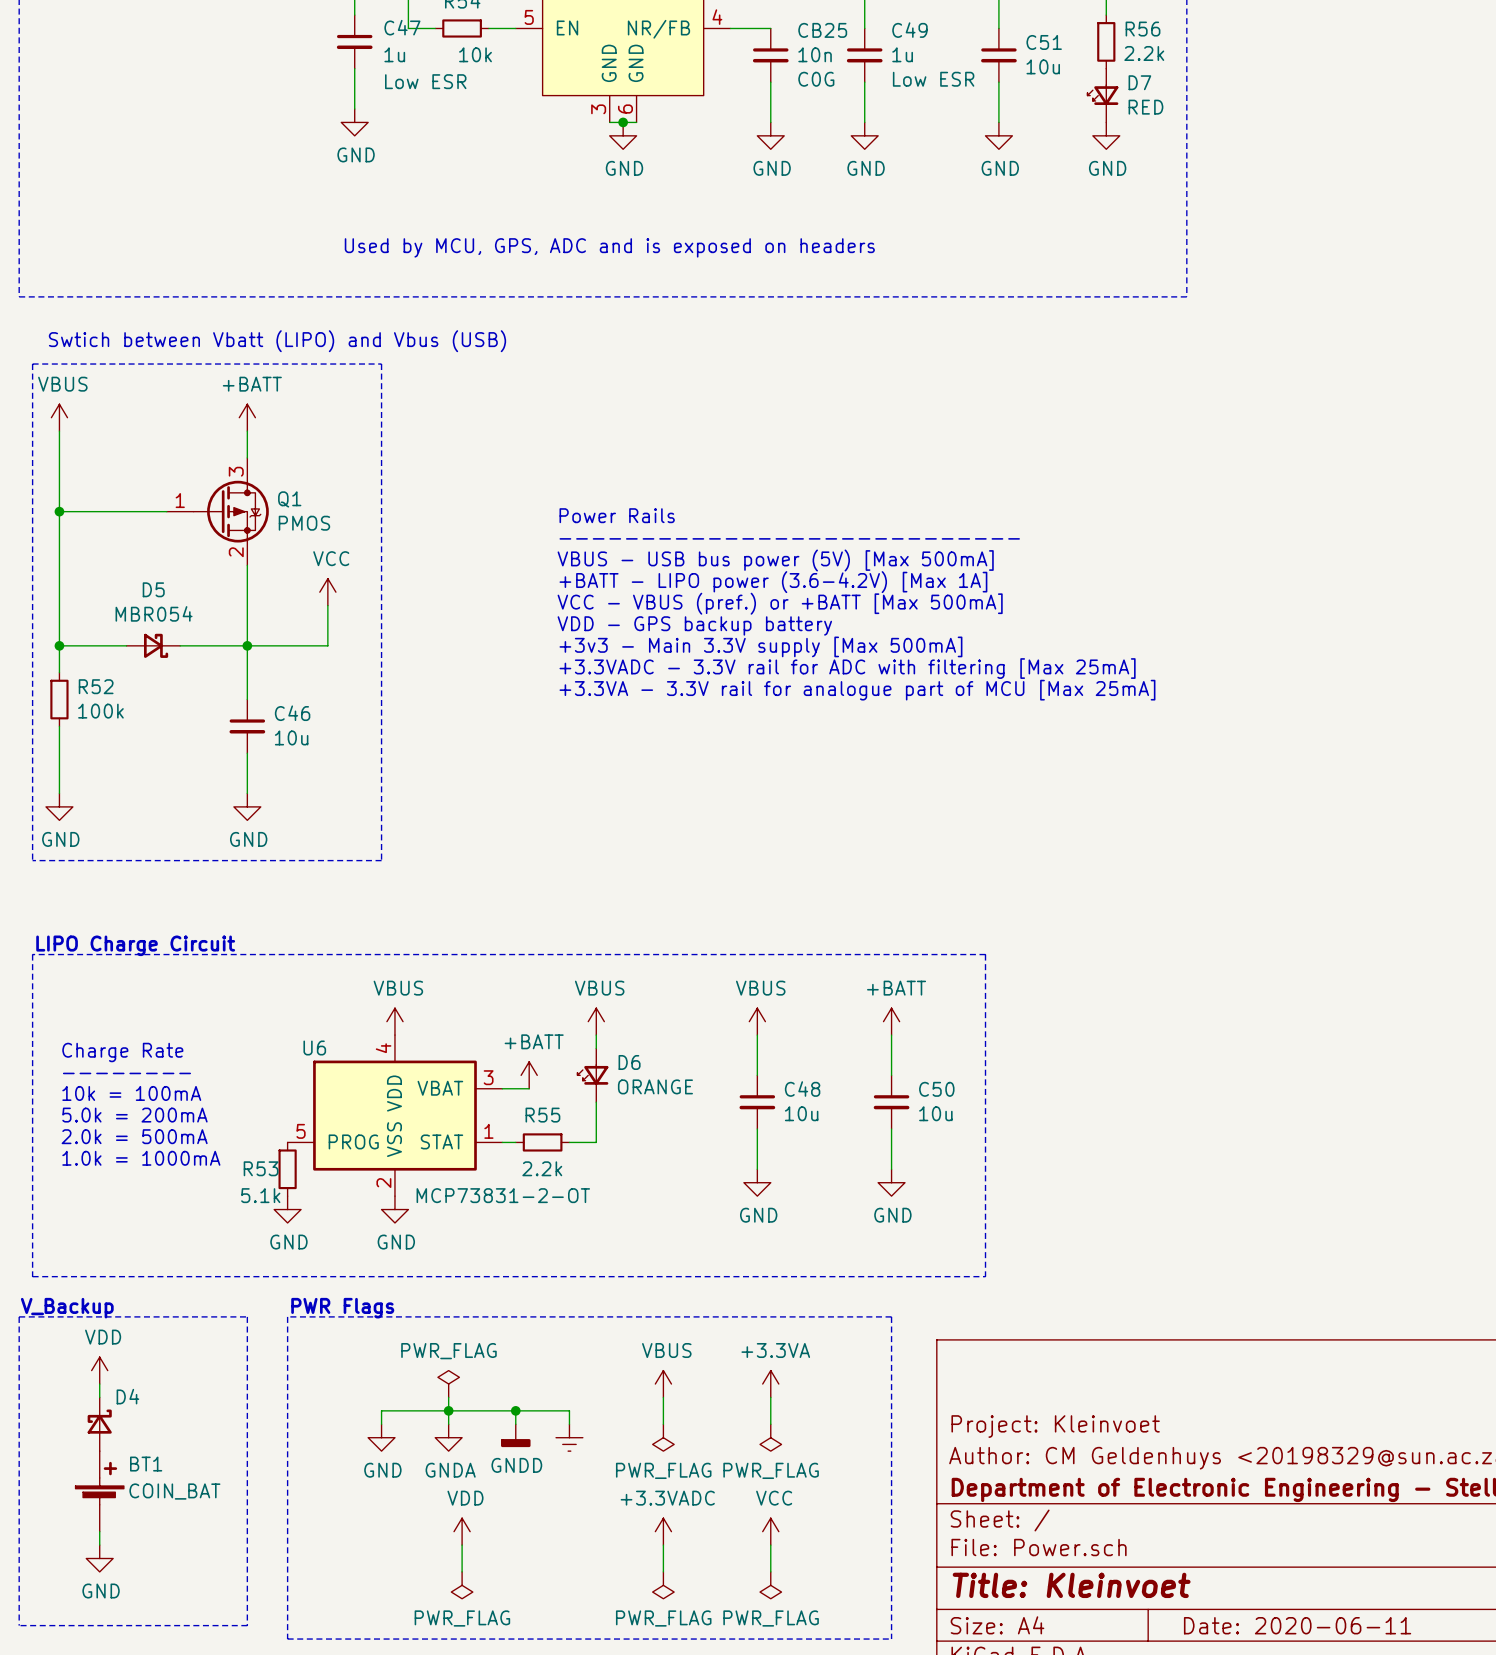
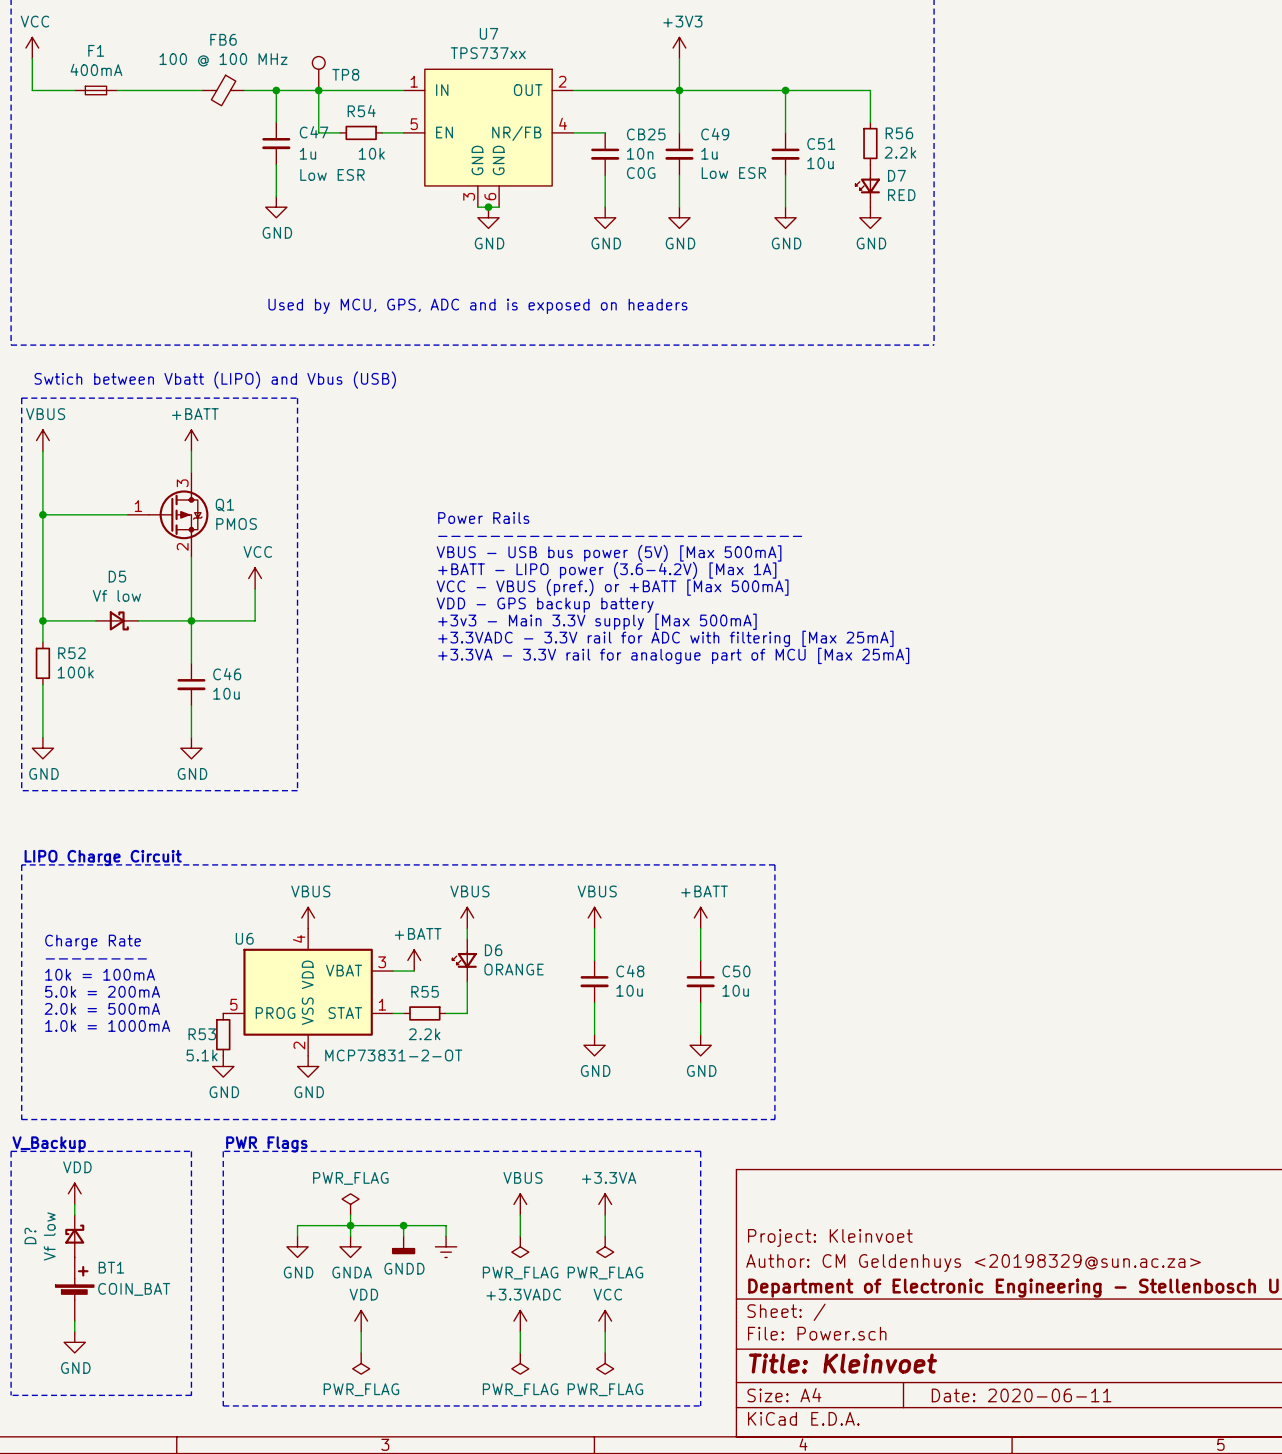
D5 value: MBR054 (154, 613) -> Vf low (116, 595)
D4 name: D4 (127, 1396) -> D? (30, 1235)
D4 value: none -> Vf low (49, 1236)

